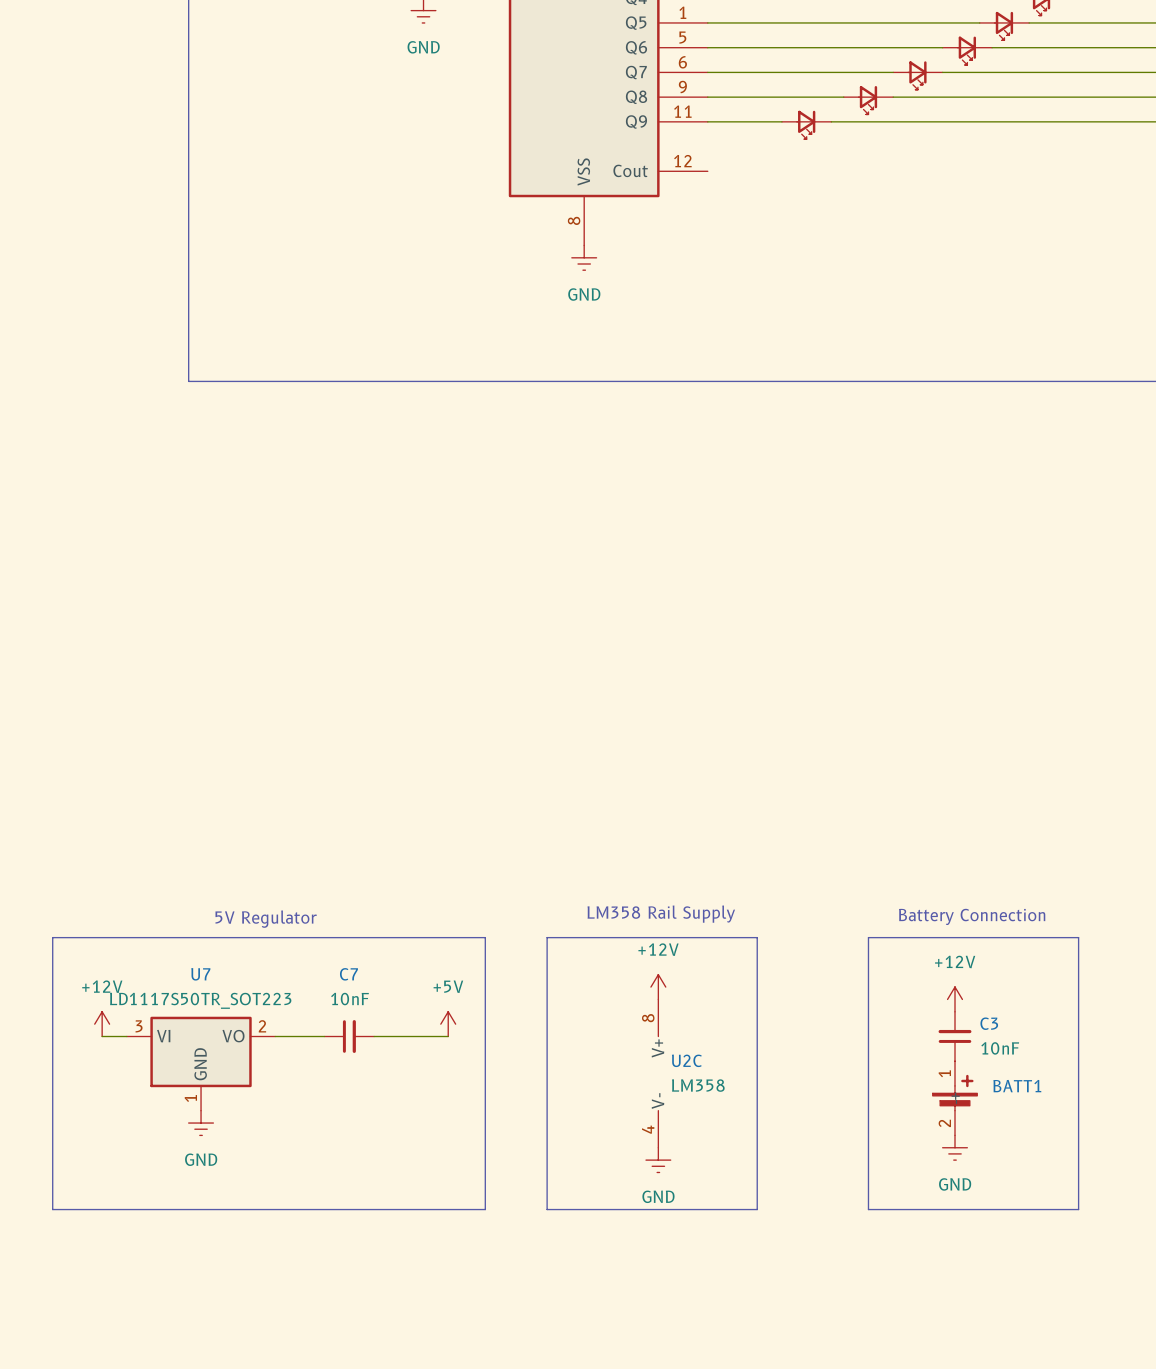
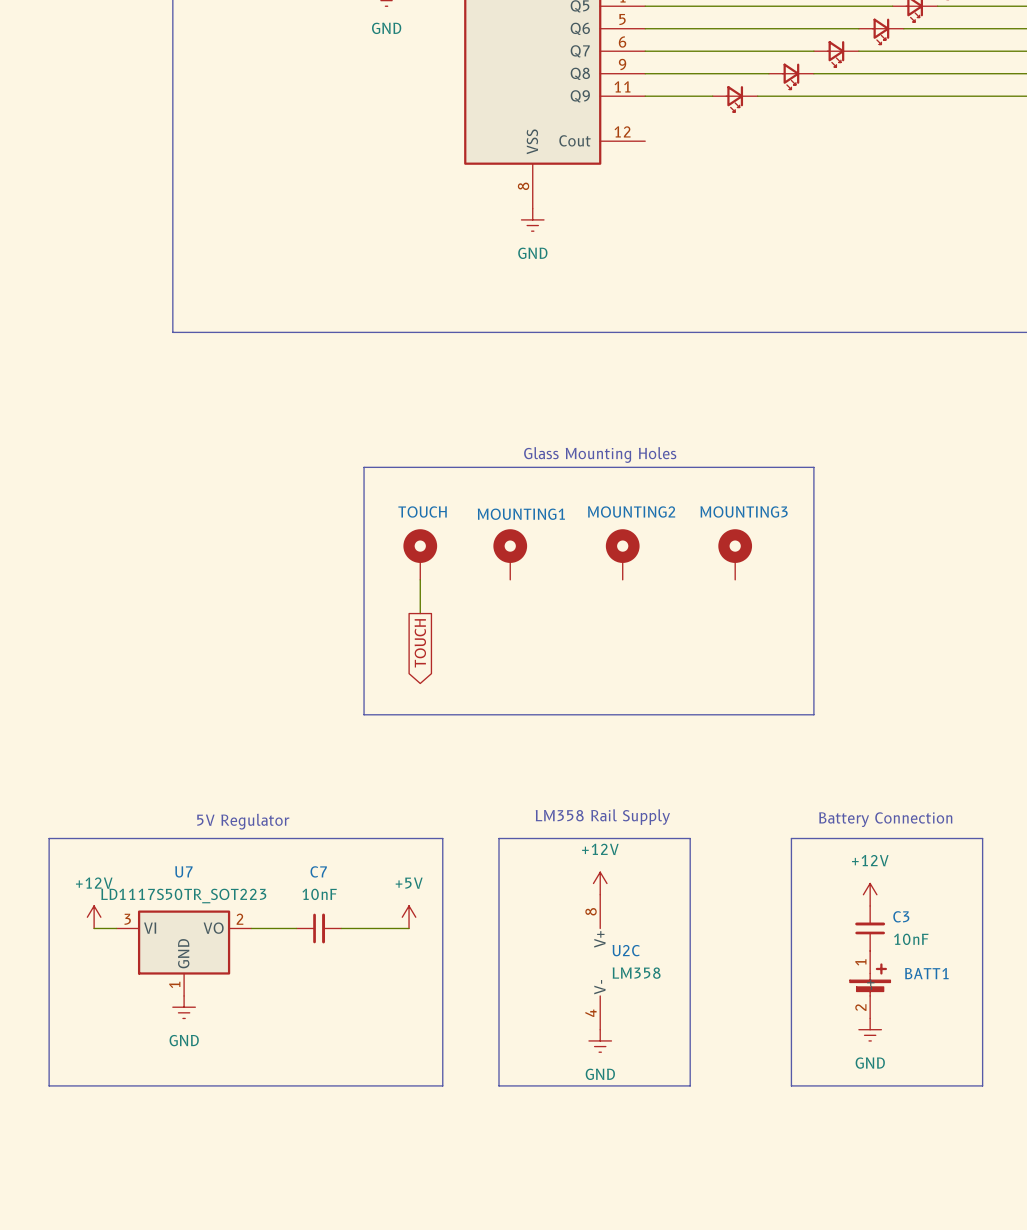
text: none -> Glass Mounting Holes (600, 455)
line: none -> (364, 467) (813, 467) (813, 714) (364, 714) (364, 467)
TOUCH: none -> (420, 554)
MOUNTING1: none -> (510, 554)
MOUNTING2: none -> (622, 554)
MOUNTING3: none -> (735, 554)
wire: none -> (420, 579) (420, 613)
global label: none -> TOUCH (420, 643)

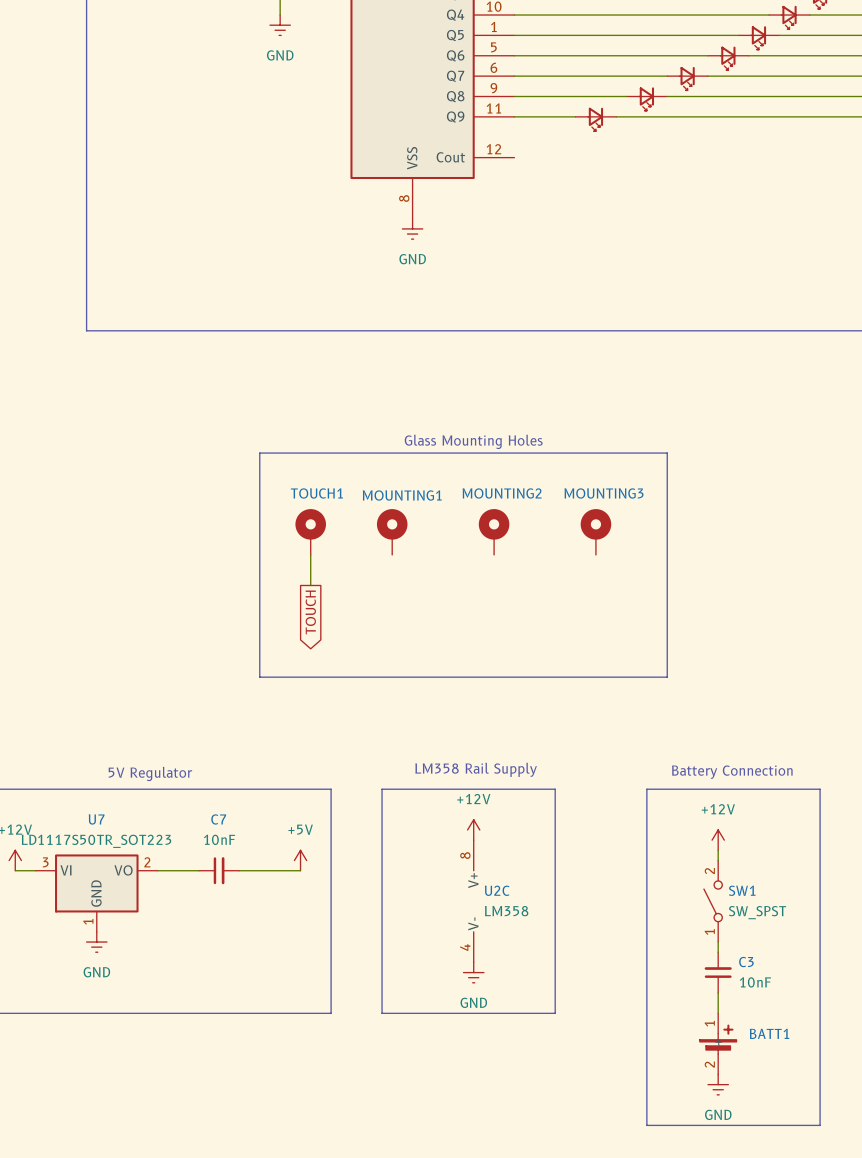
TOUCH name: TOUCH (422, 511) -> TOUCH1 (316, 493)
C3 position: (870, 928) -> (718, 972)
SW1: none -> SW_SPST (713, 901)
BATT1 position: (870, 984) -> (718, 1043)
power symbol position: GND (870, 1029) -> GND (718, 1084)
wire: none -> (718, 992) (718, 1013)
line: (791, 1085) (982, 1085) -> (646, 1013) (646, 1125) (820, 1125) (820, 1013)

